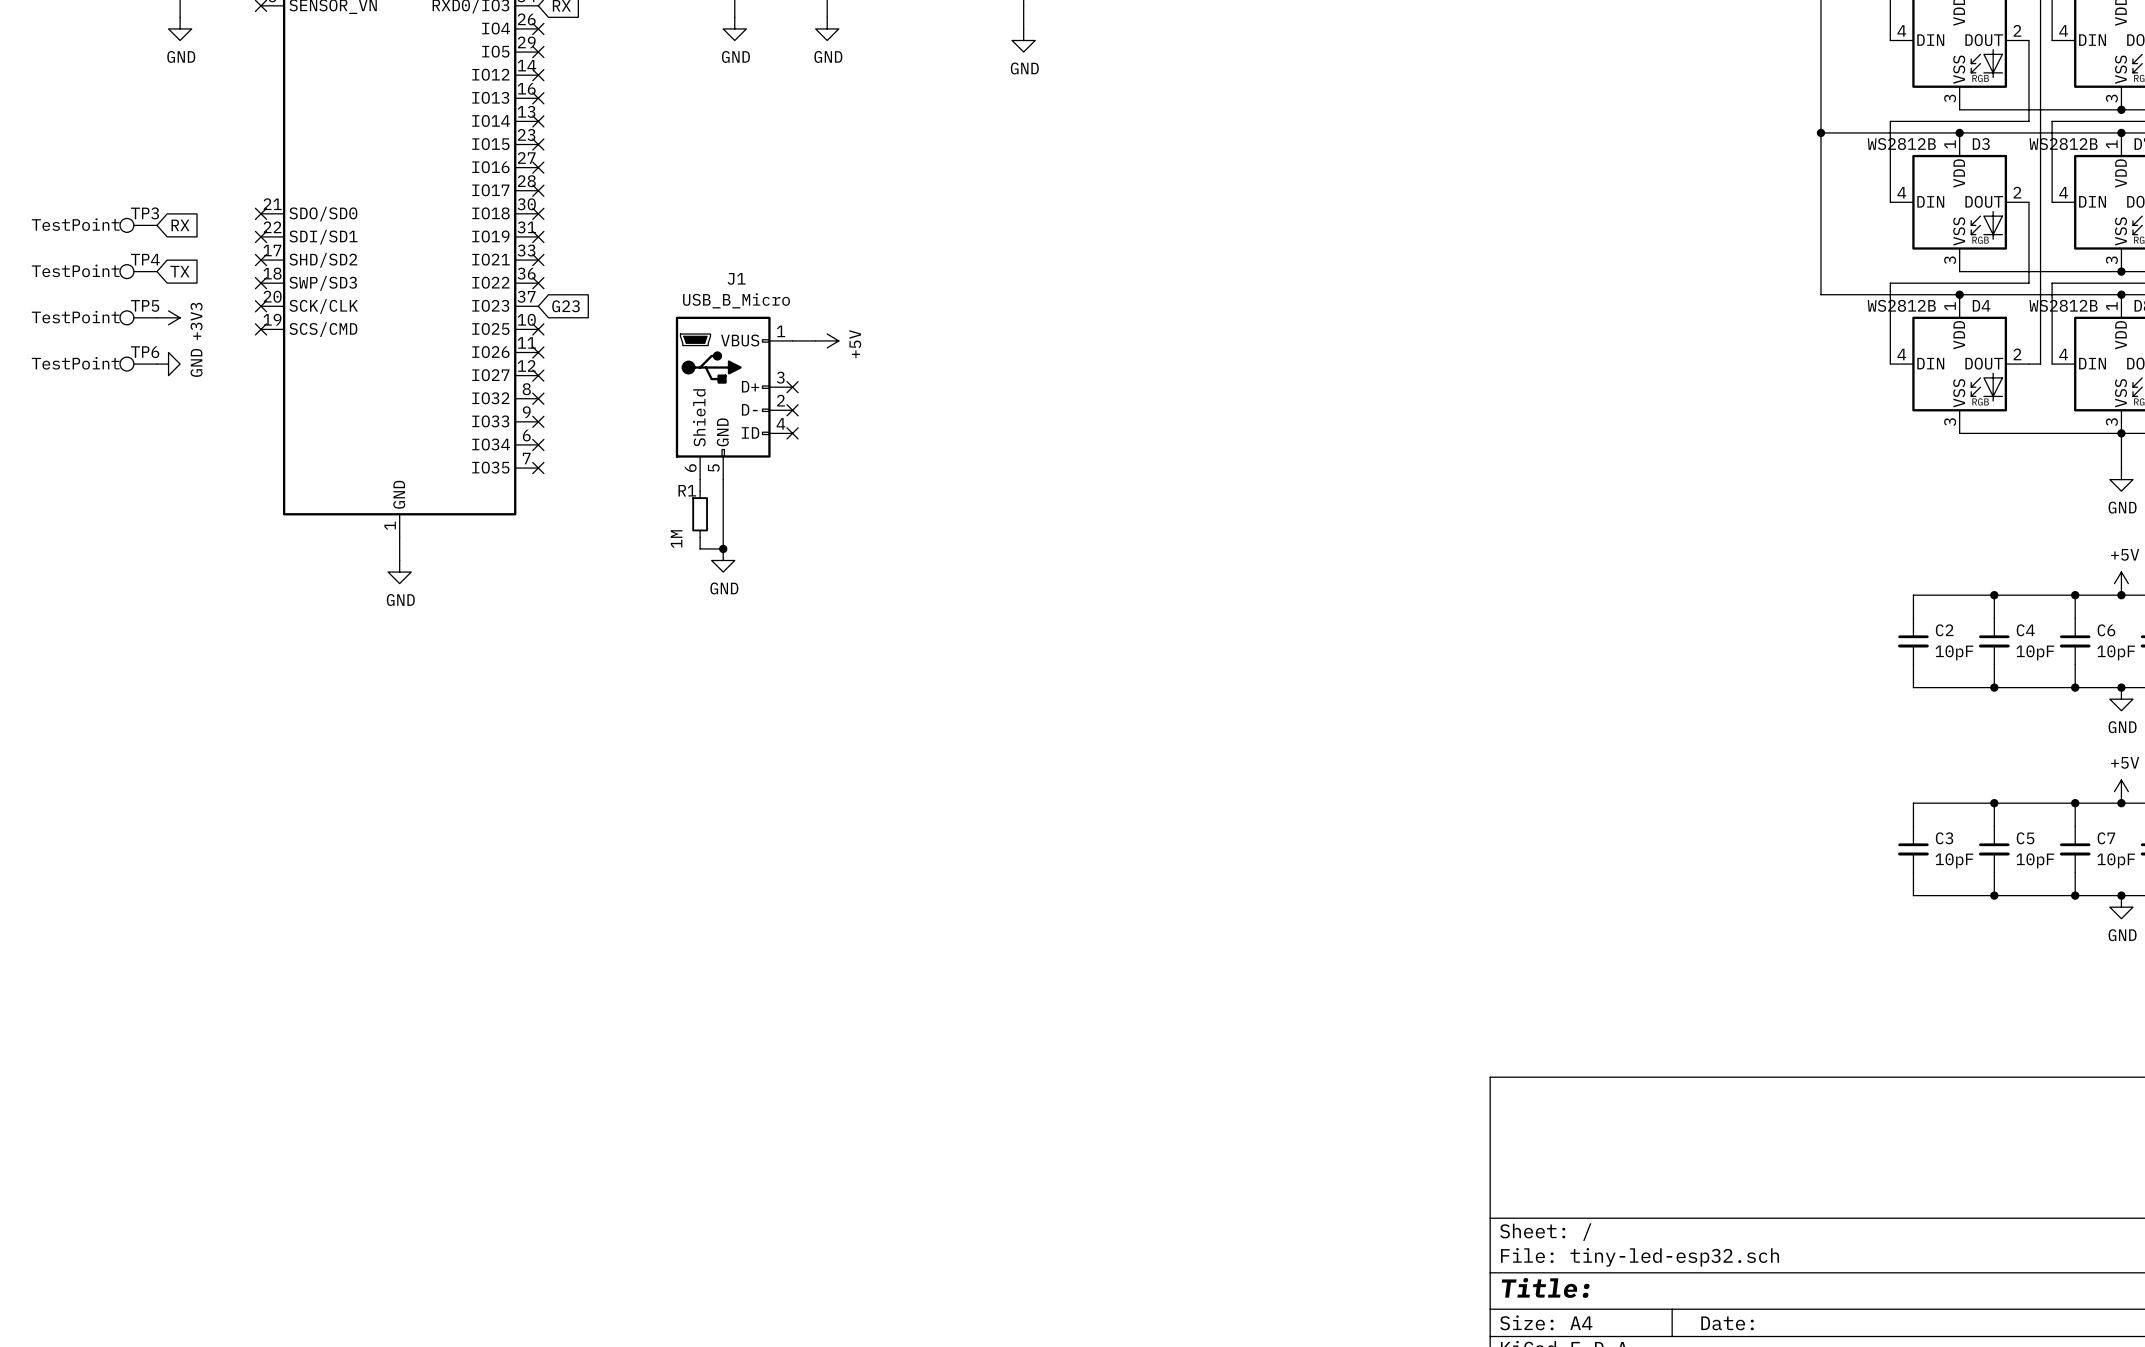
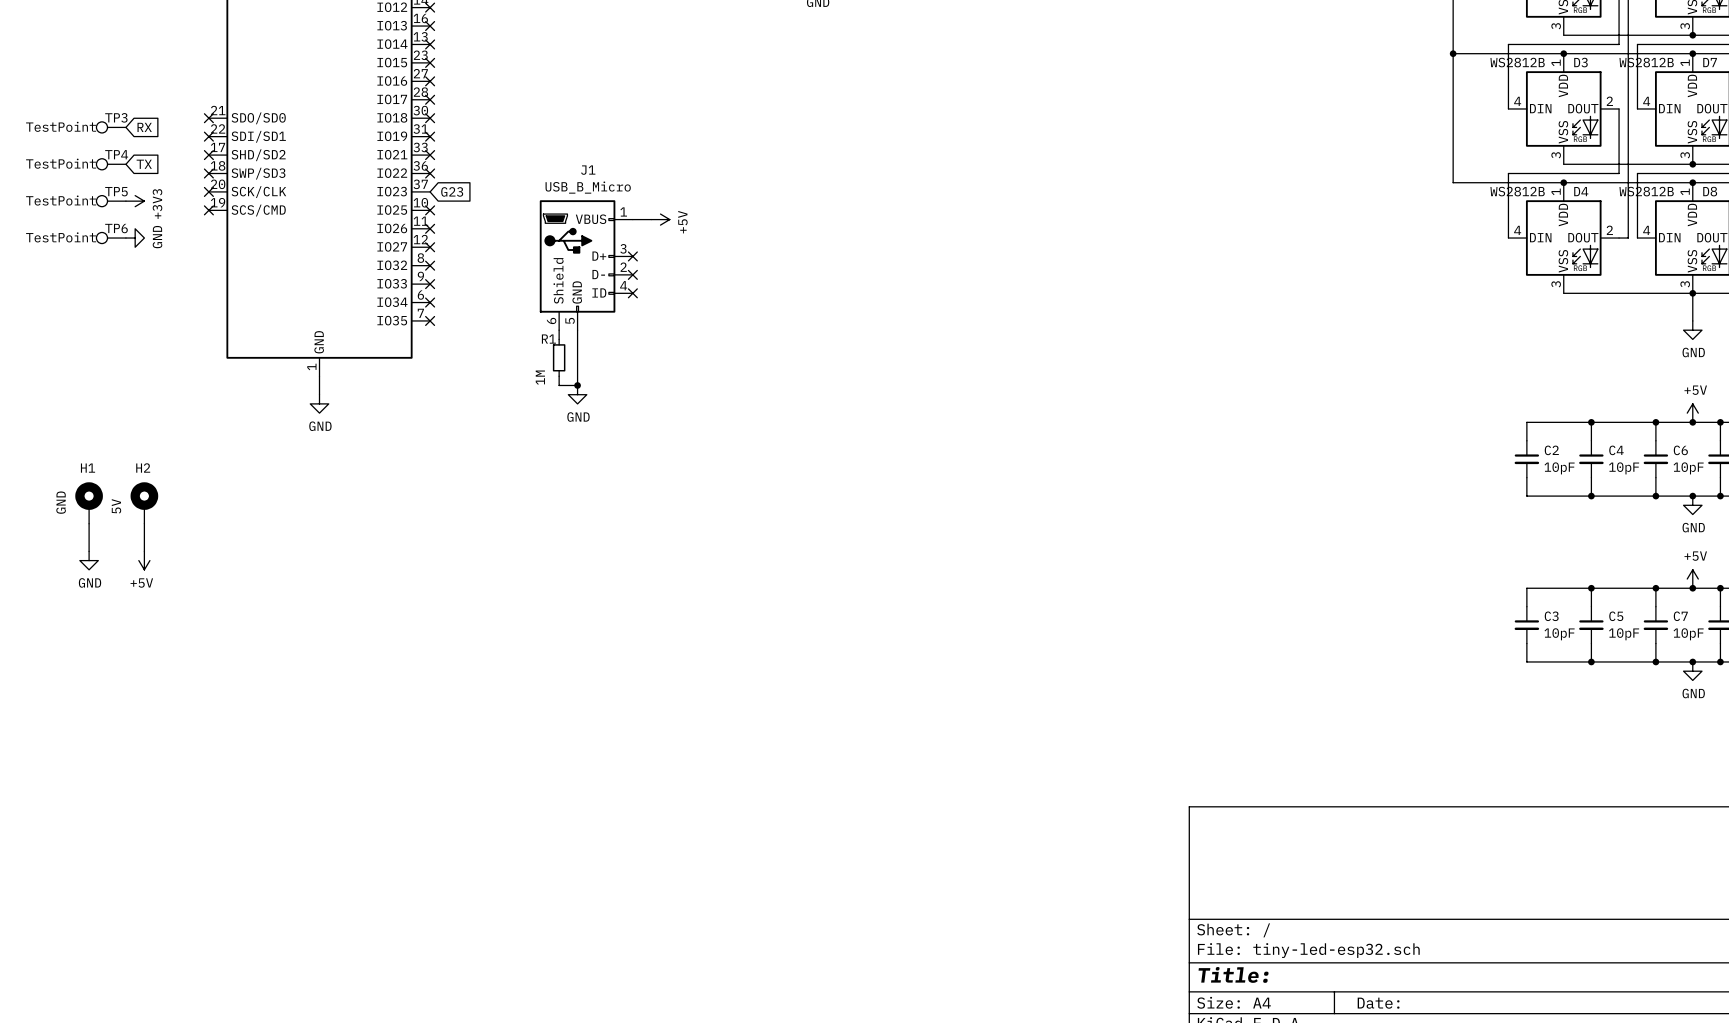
H1: none -> GND (89, 502)
H2: none -> 5V (144, 502)
wire: none -> (89, 523) (89, 551)
wire: none -> (144, 523) (144, 551)
power symbol: none -> GND (89, 560)
power symbol: none -> +5V (144, 560)

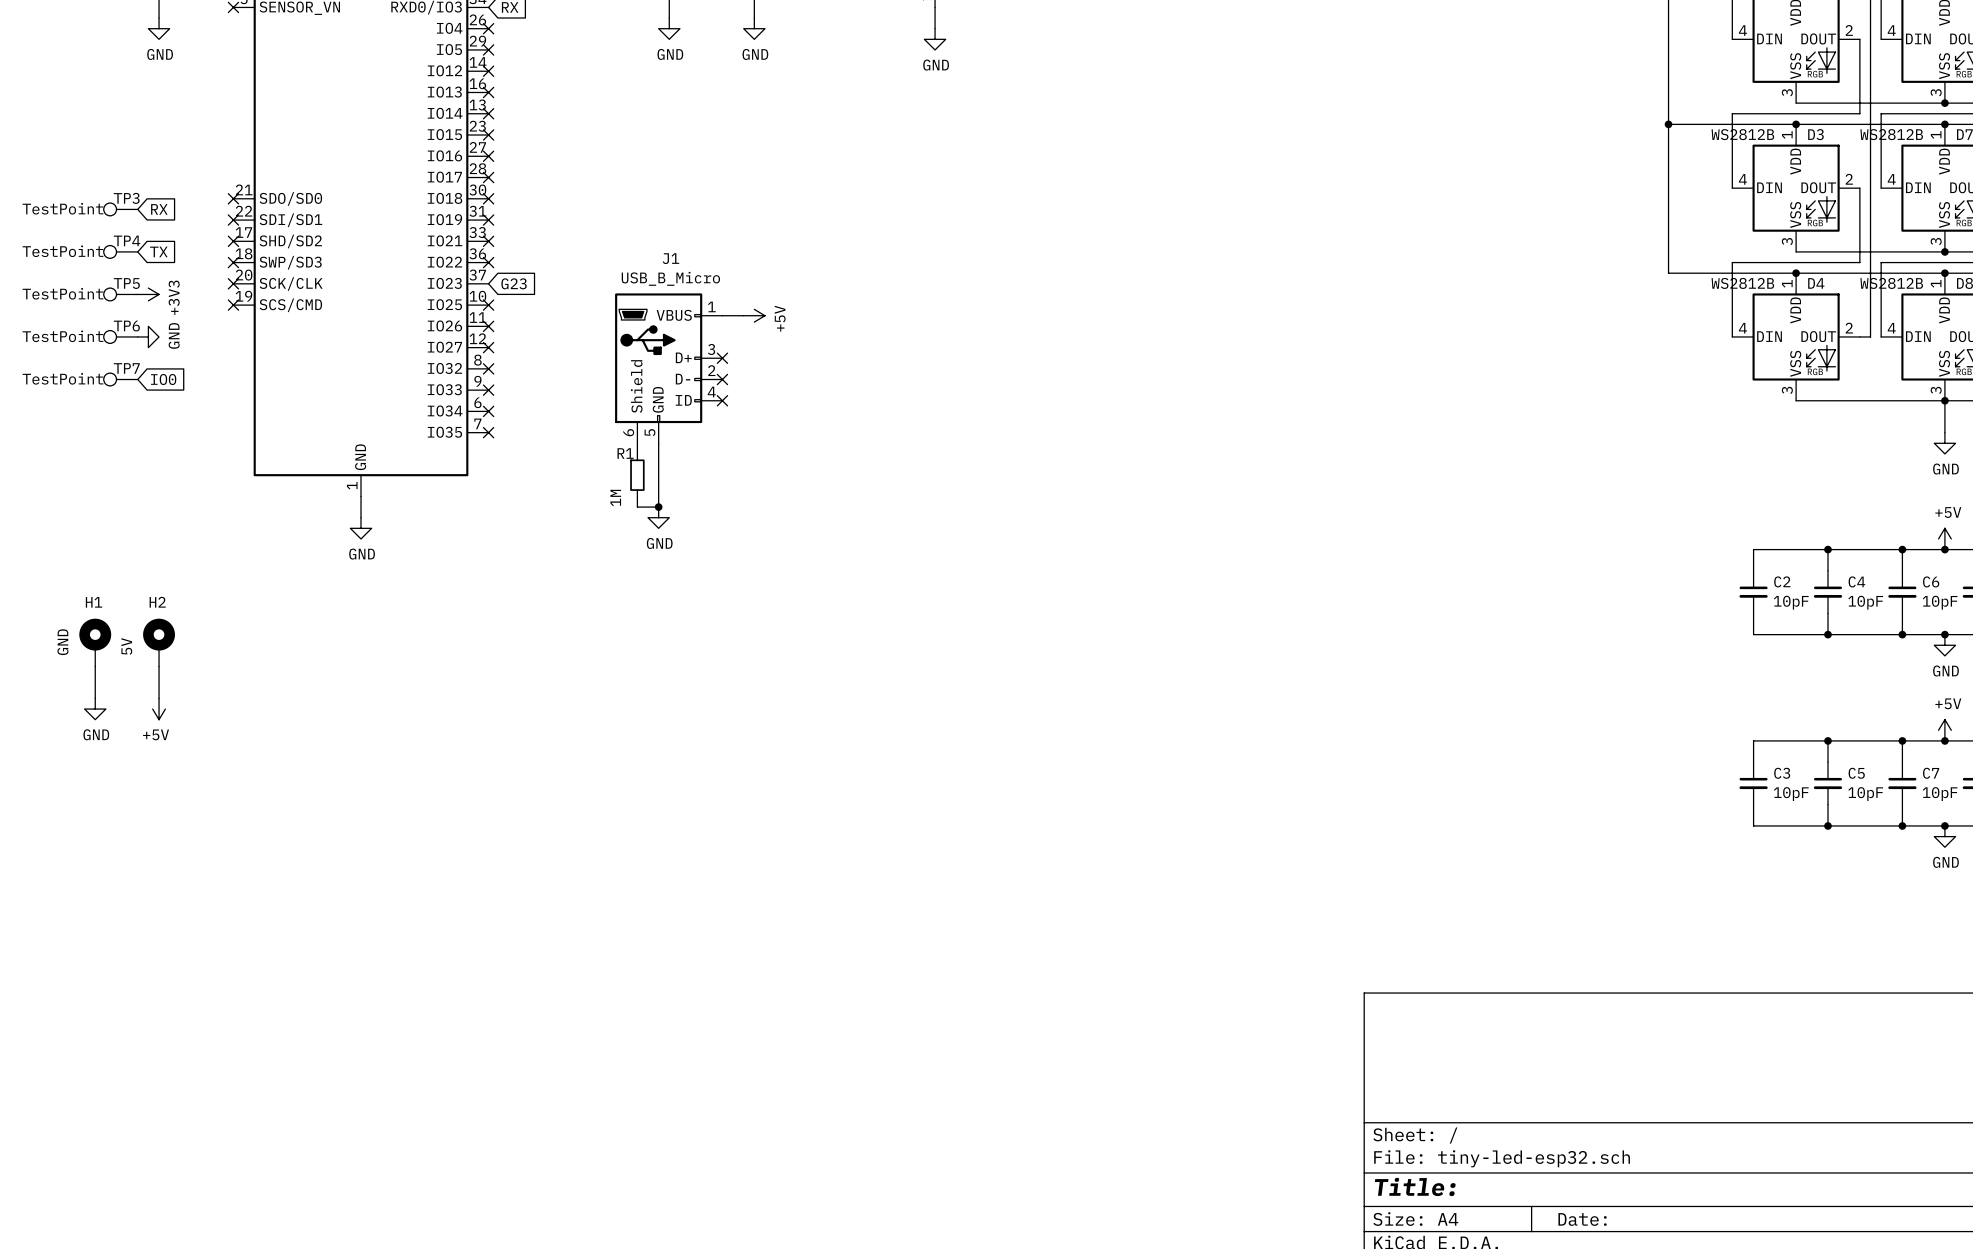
TP7: none -> TestPoint (120, 379)
global label: none -> IO0 (163, 379)

